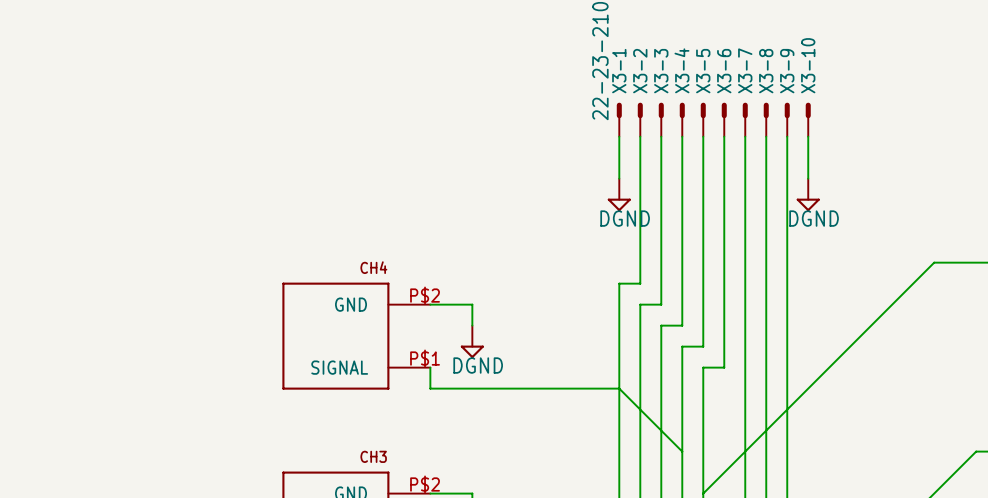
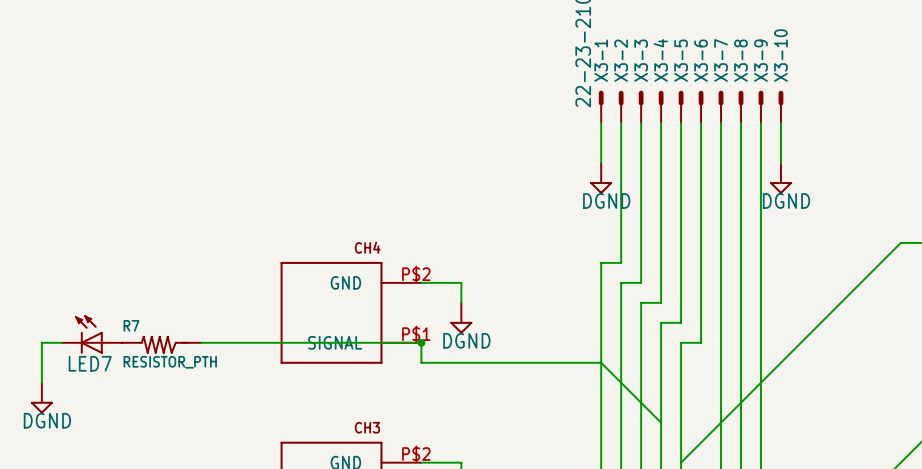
LED7: none -> (91, 334)
wire: none -> (61, 342) (41, 342) (41, 382)
wire: none -> (201, 342) (421, 342)
junction: none -> (421, 342)
R7: none -> RESISTOR_PTH (161, 344)
power symbol: none -> DGND (41, 398)

